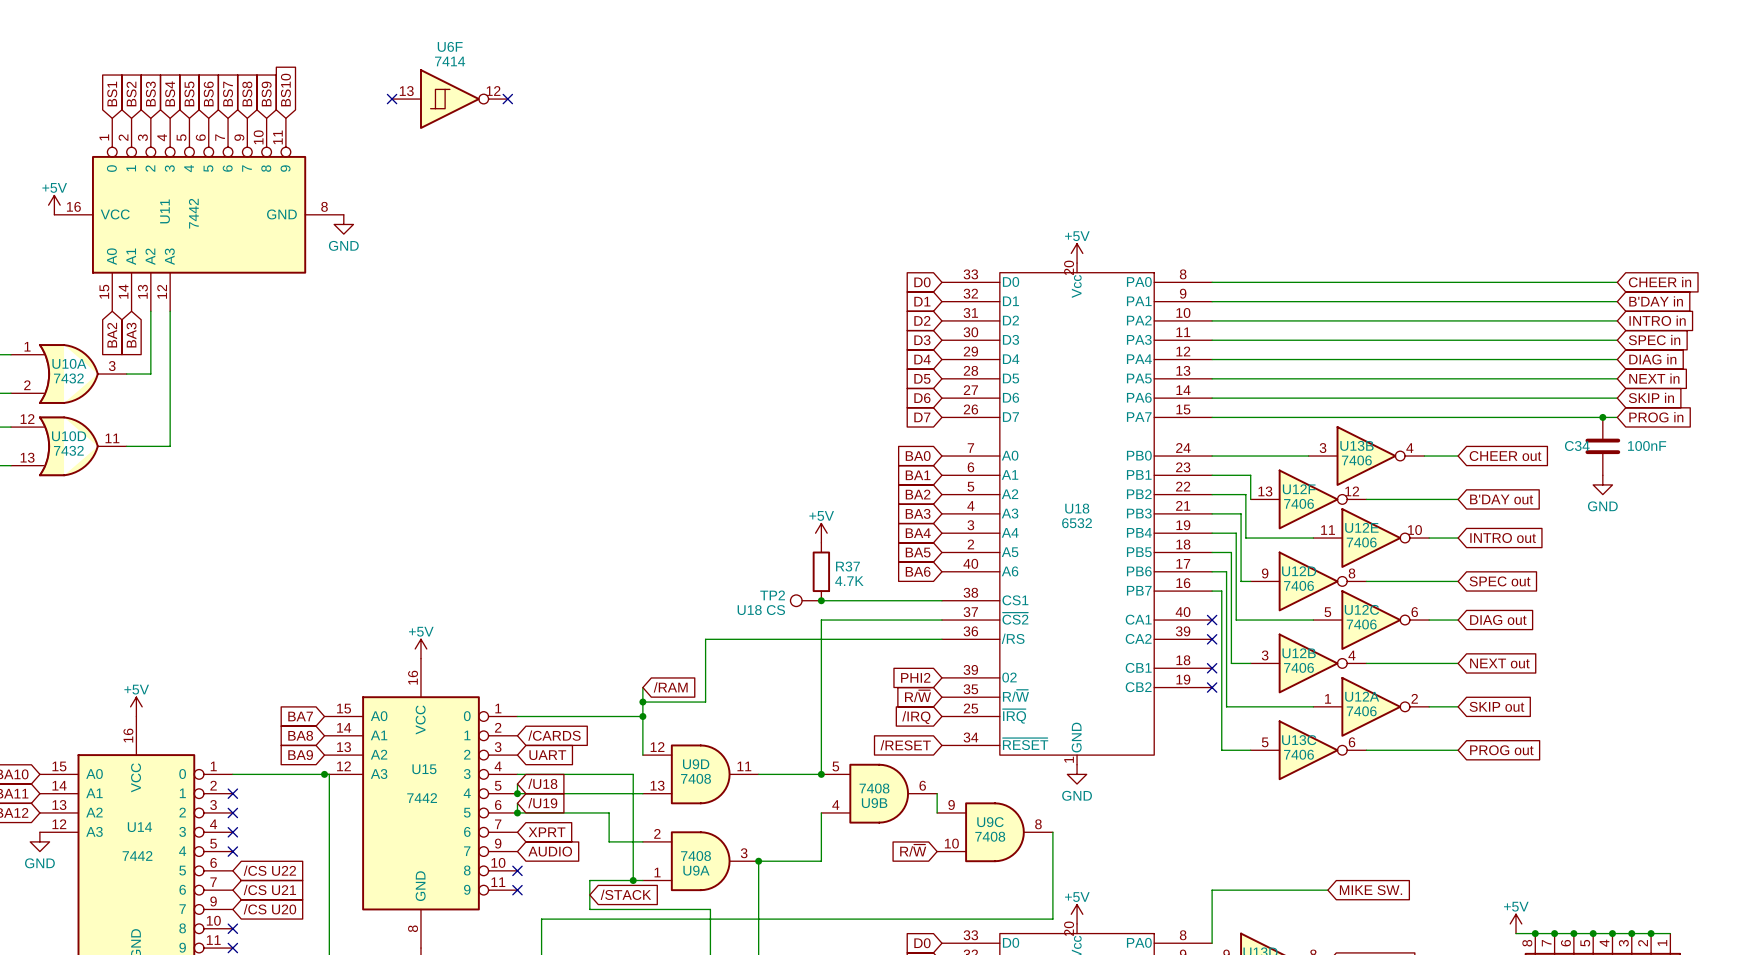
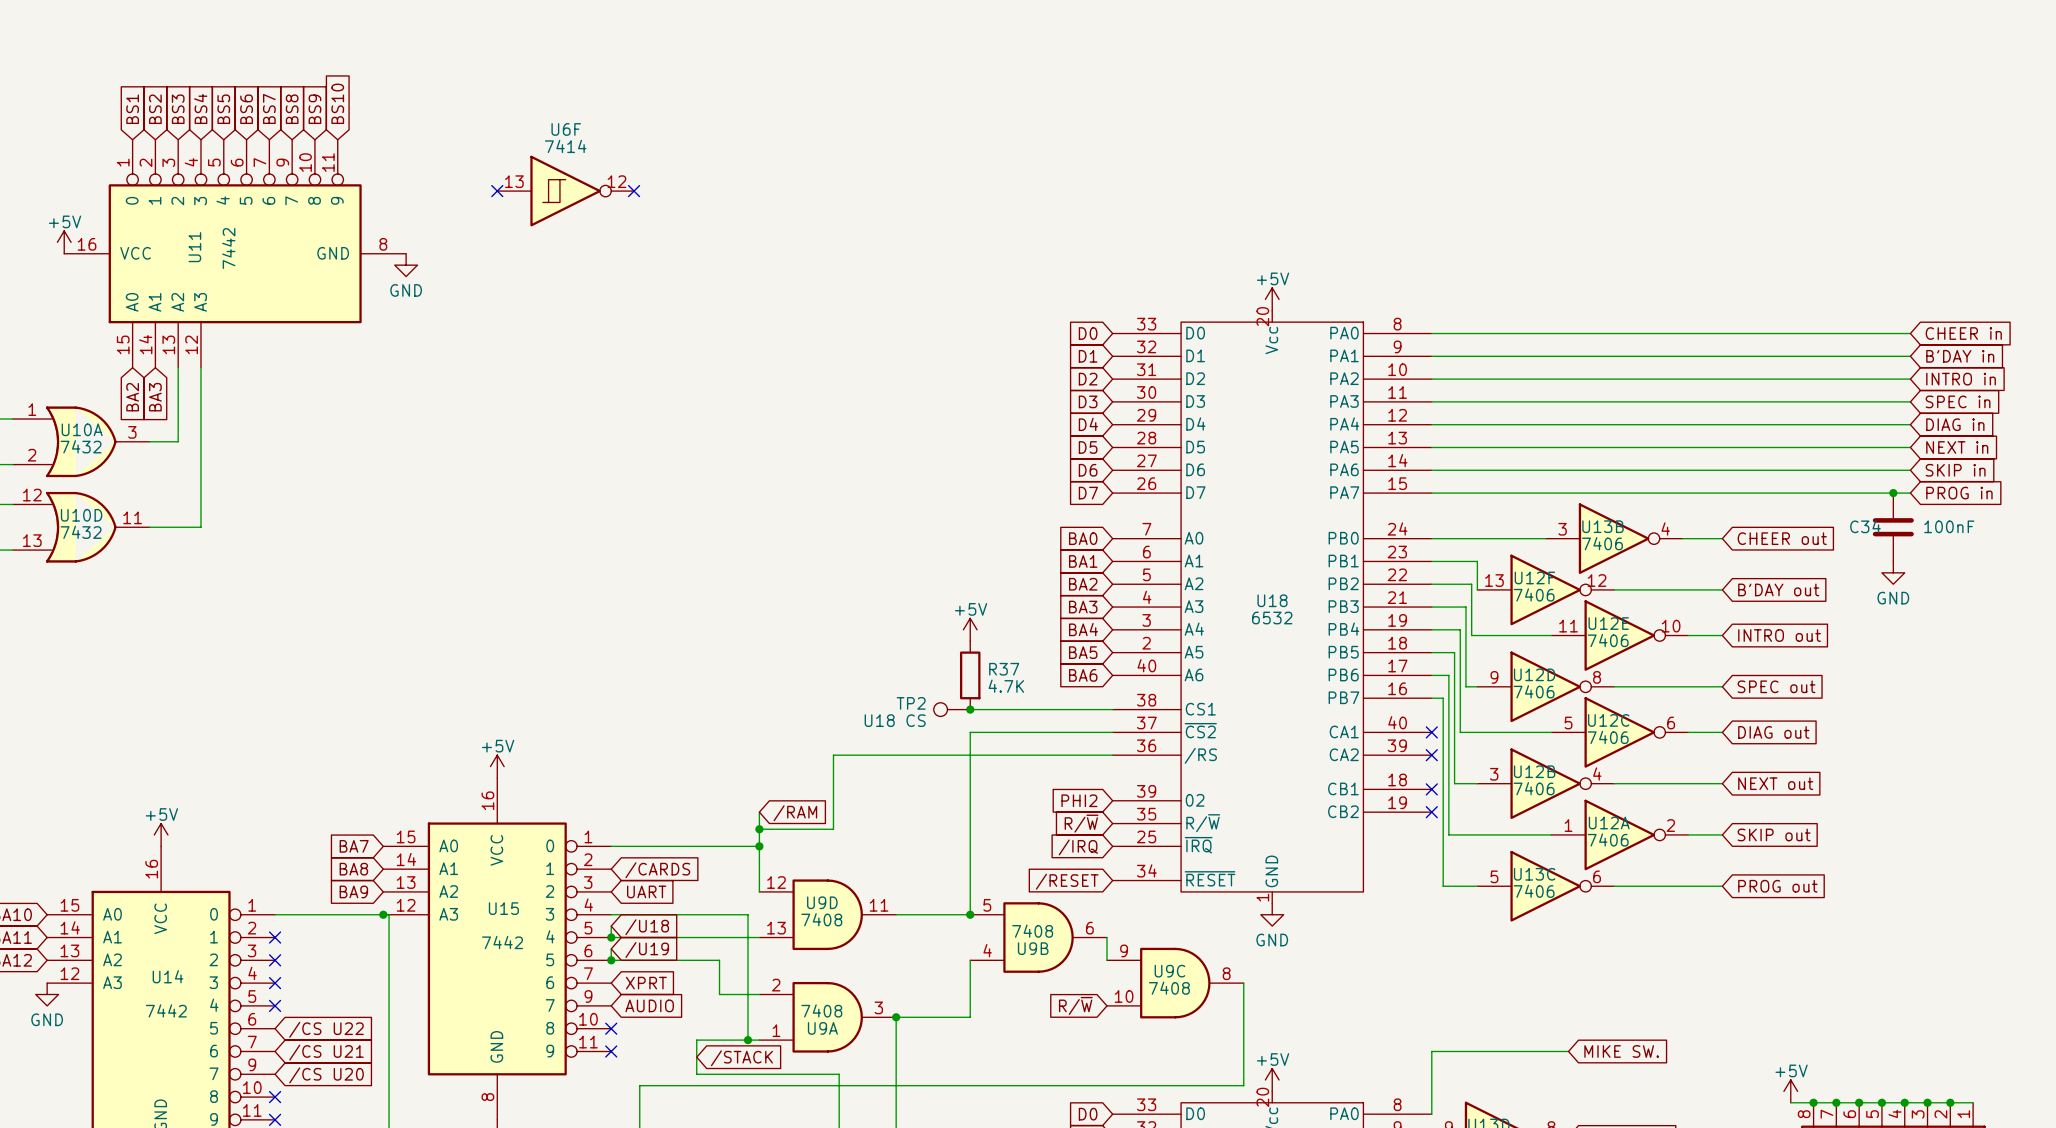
no-connect mark: (392, 99) -> none
U6F position: (449, 99) -> (565, 191)
no-connect mark: (507, 99) -> none
no-connect mark: none -> (497, 191)
no-connect mark: none -> (634, 191)

